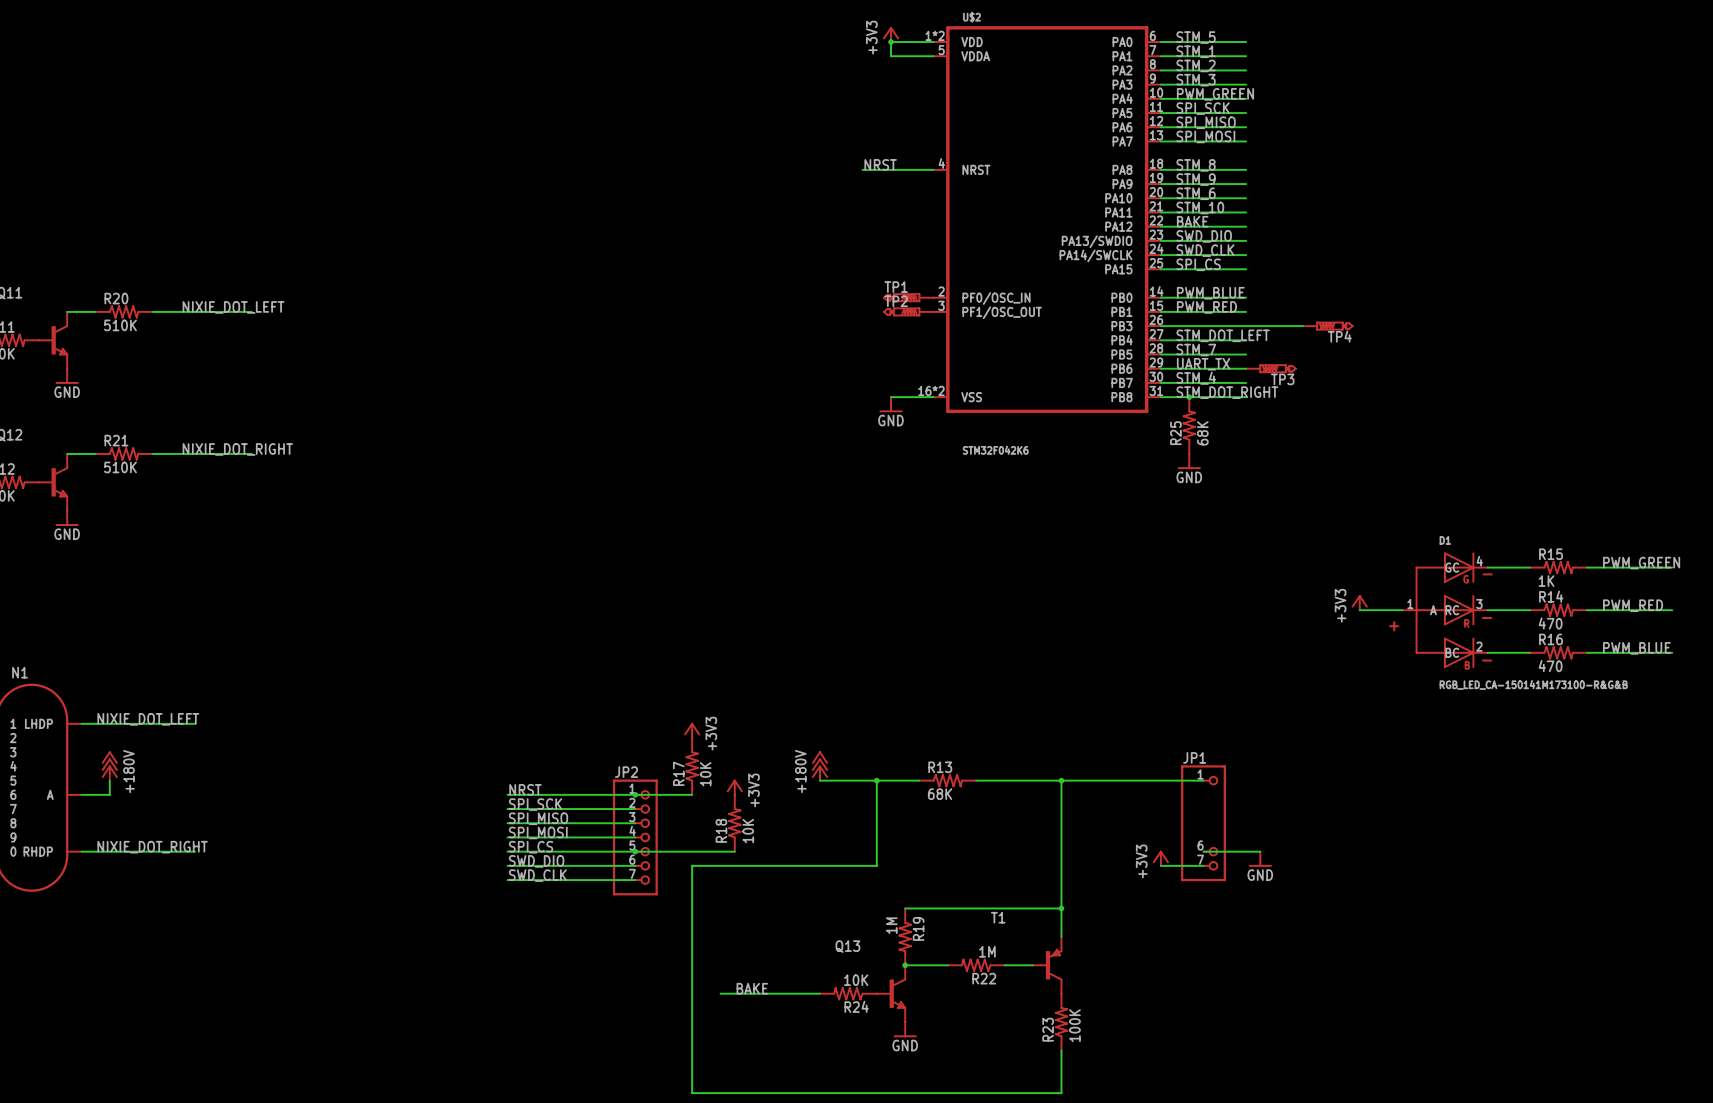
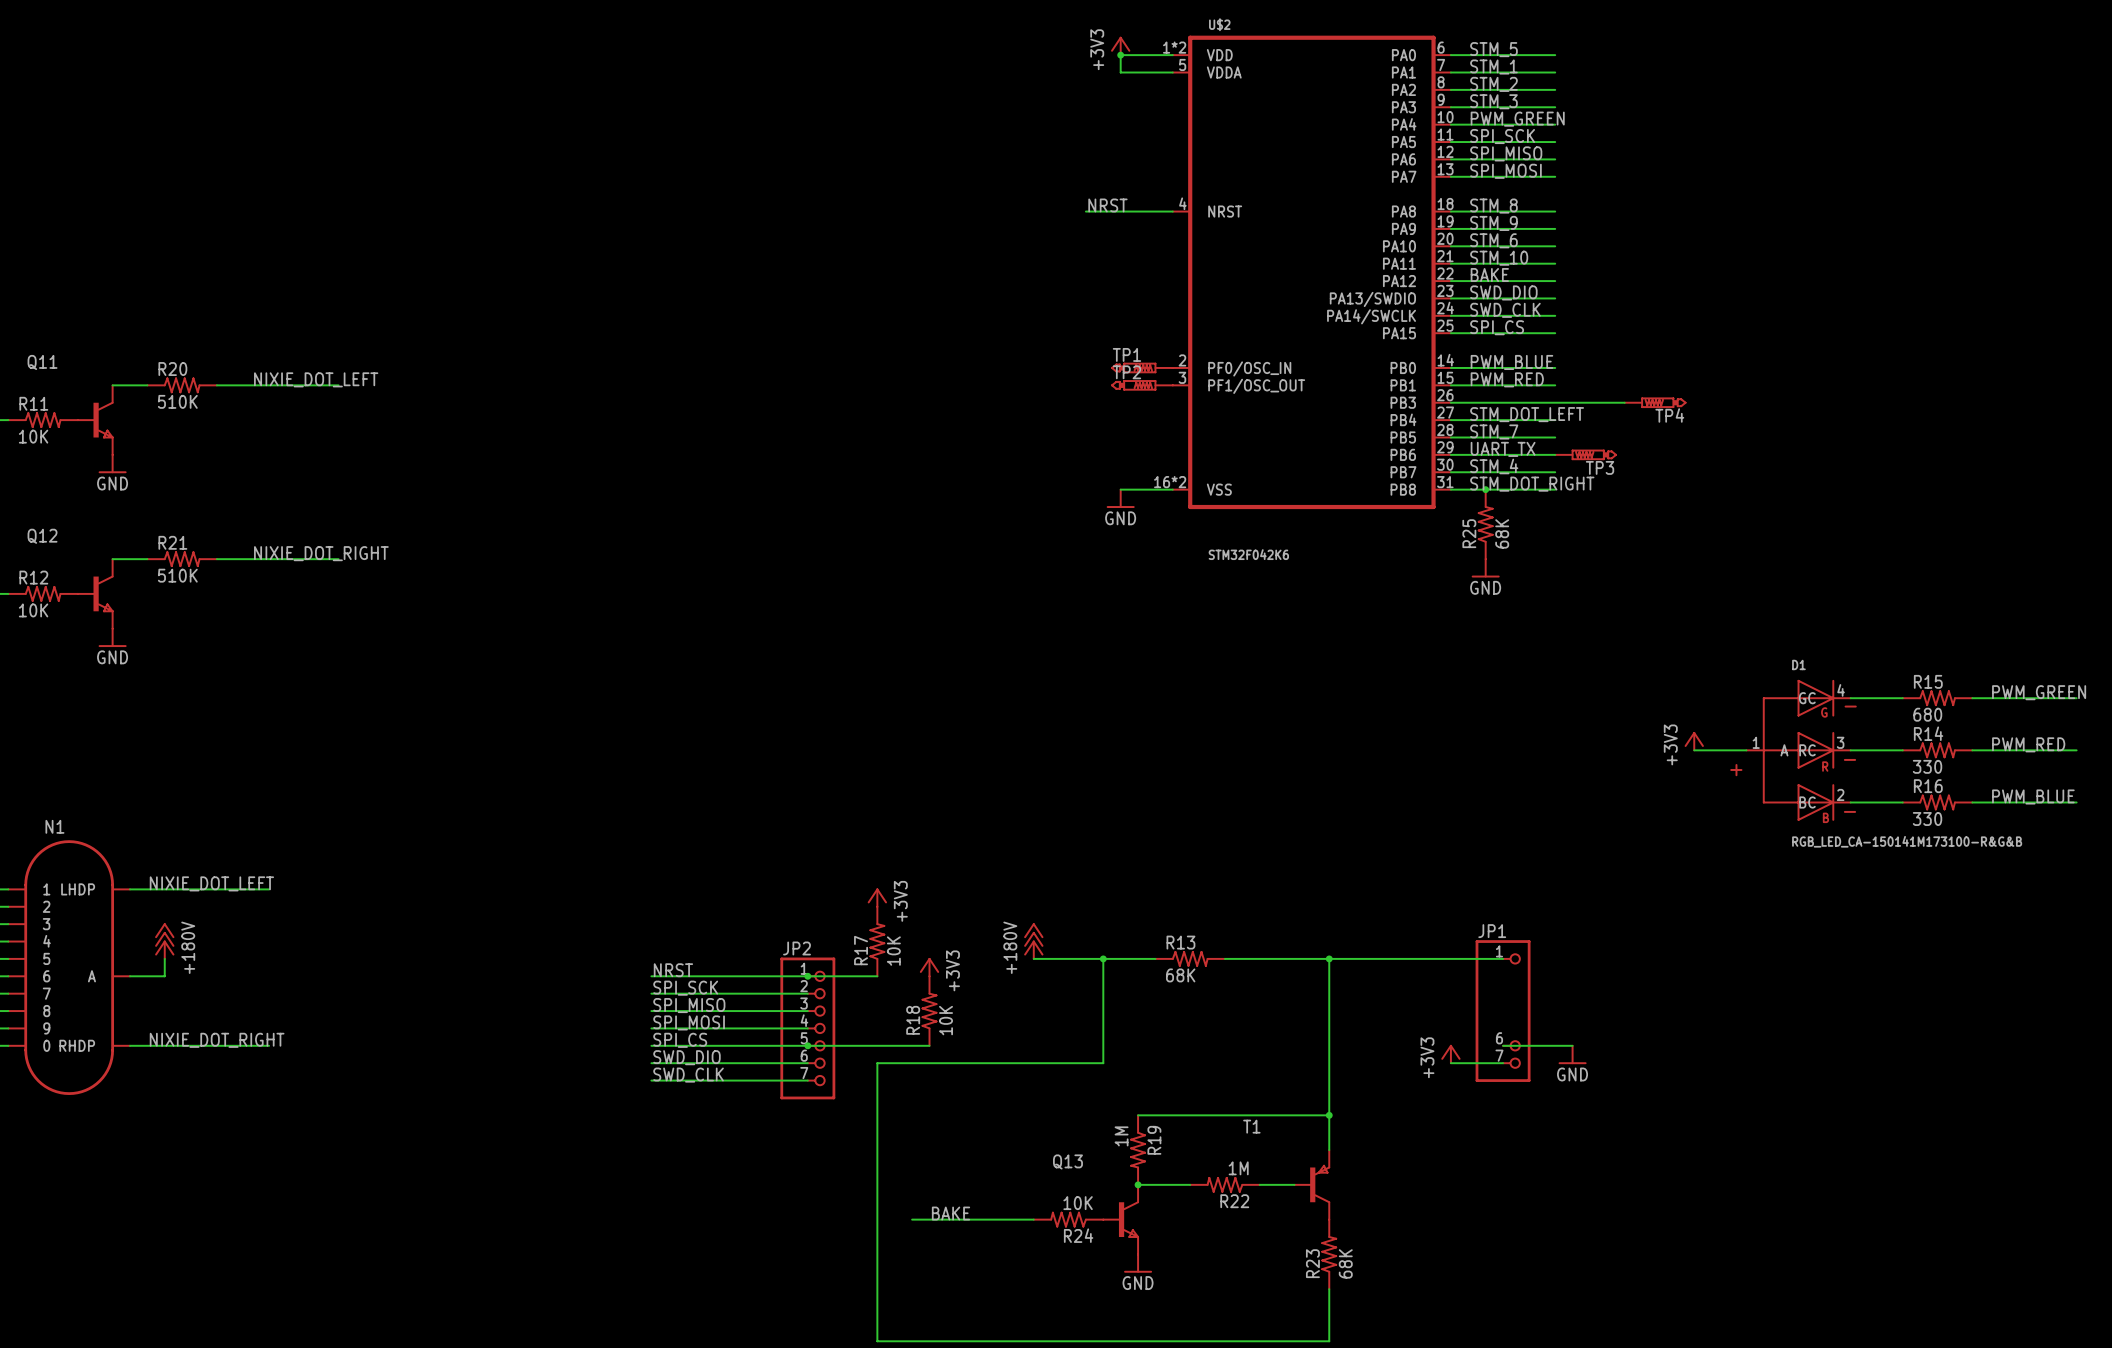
R15 value: 1K (1546, 581) -> 680 (1927, 714)
R14 value: 470 (1550, 623) -> 330 (1927, 766)
R16 value: 470 (1550, 666) -> 330 (1927, 819)
R23 value: 100K (1074, 1025) -> 68K (1345, 1263)

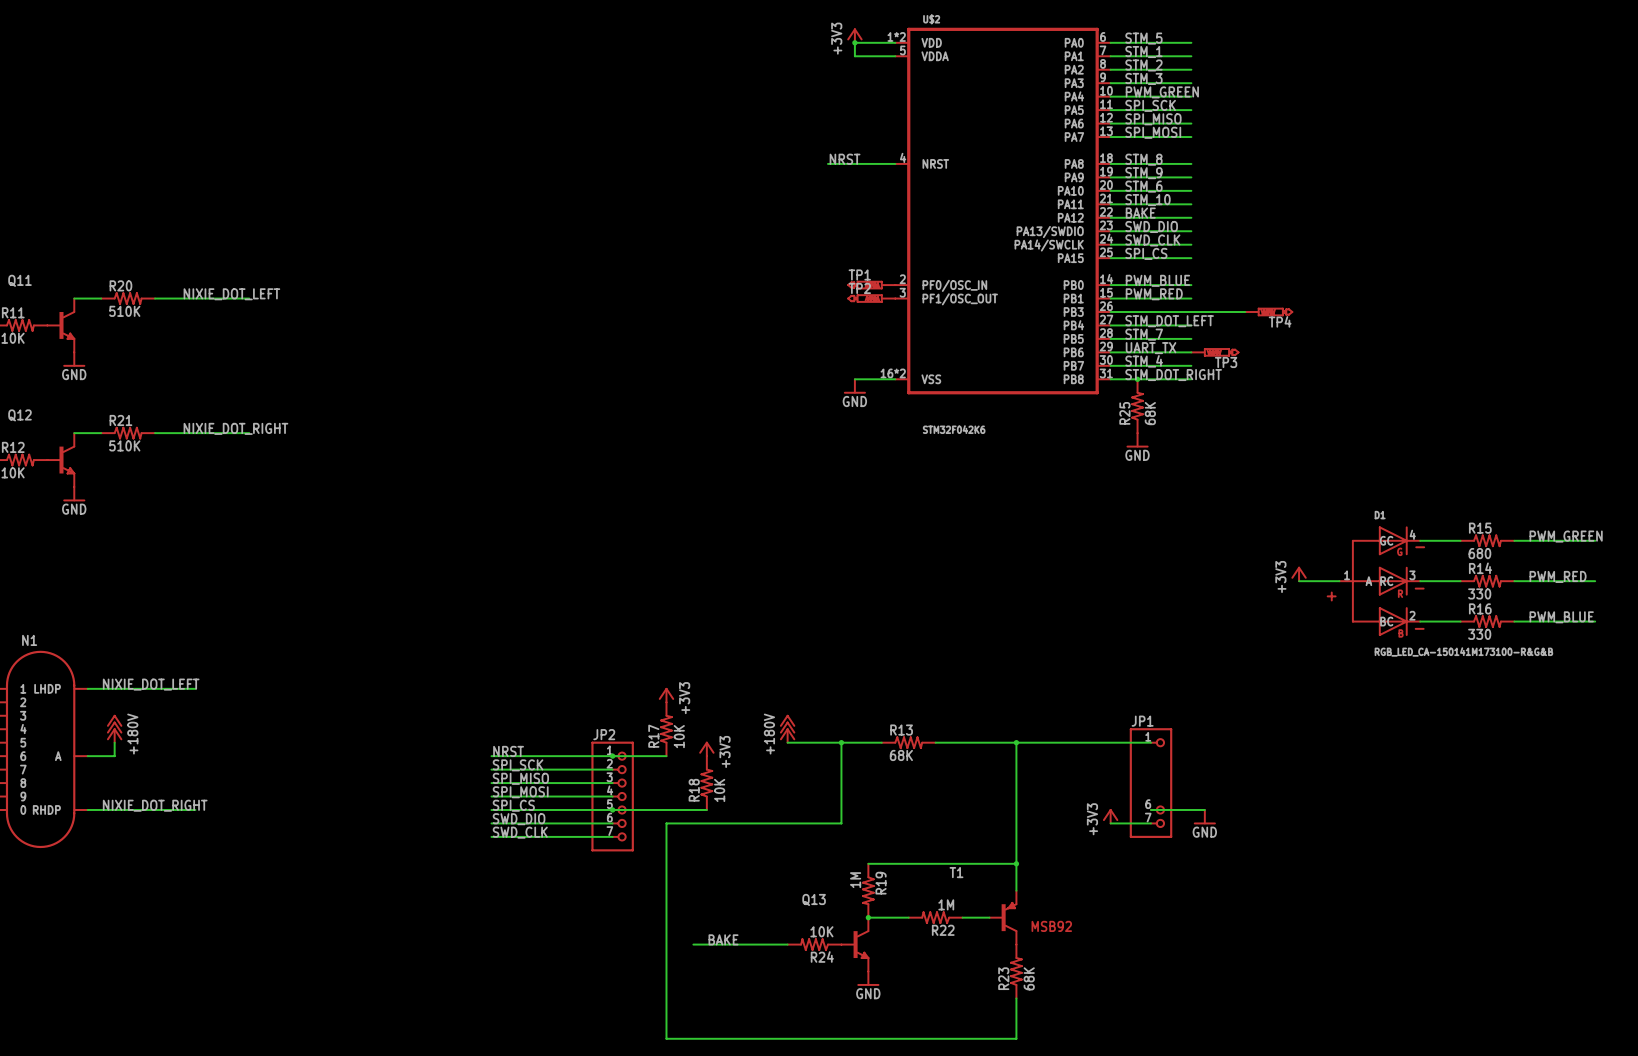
text: none -> MSB92 (1051, 926)

